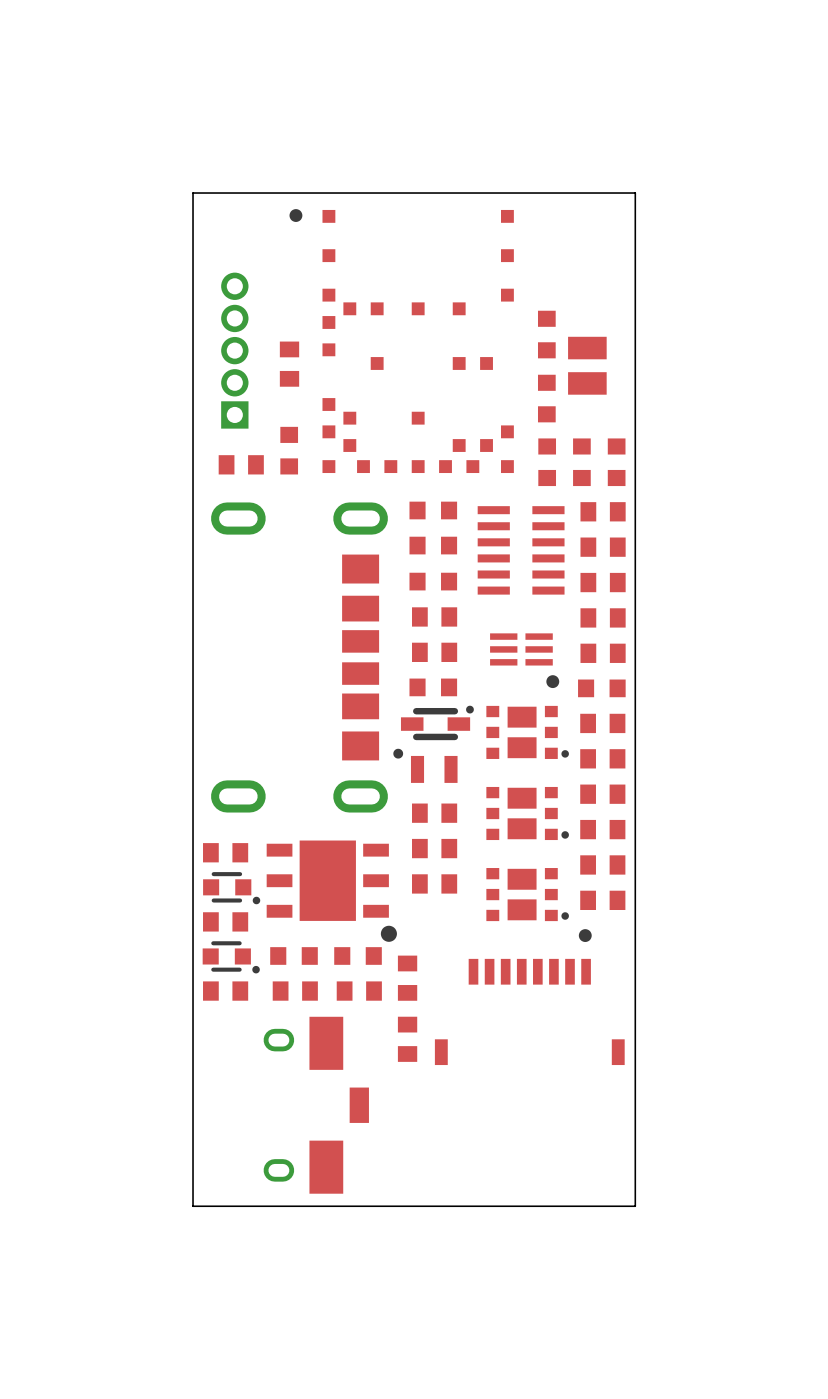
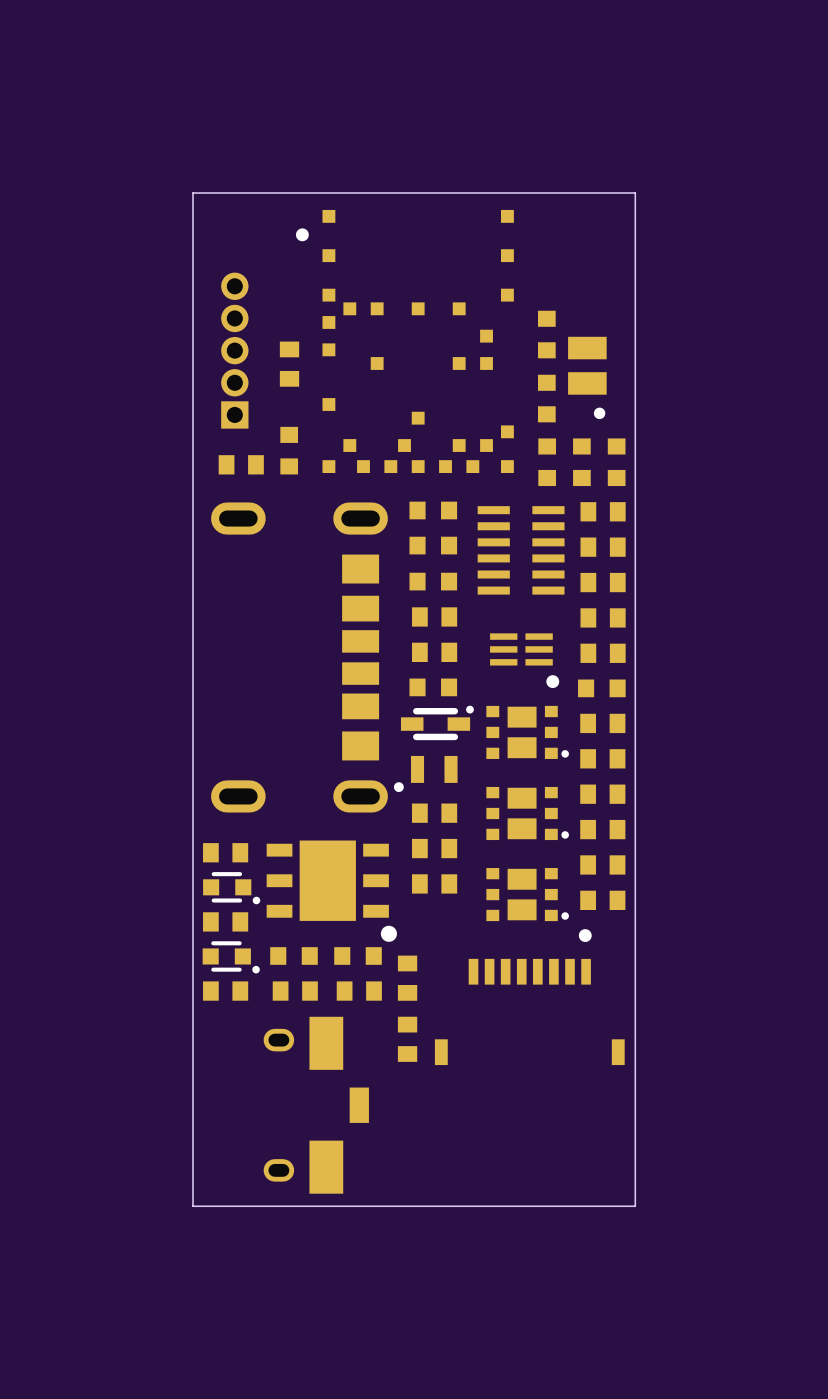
part footprint: [289, 209, 514, 474] -> [295, 209, 514, 474]
part footprint: [568, 336, 607, 395] -> [568, 336, 607, 420]
part footprint: [393, 748, 458, 783] -> [393, 755, 458, 793]

